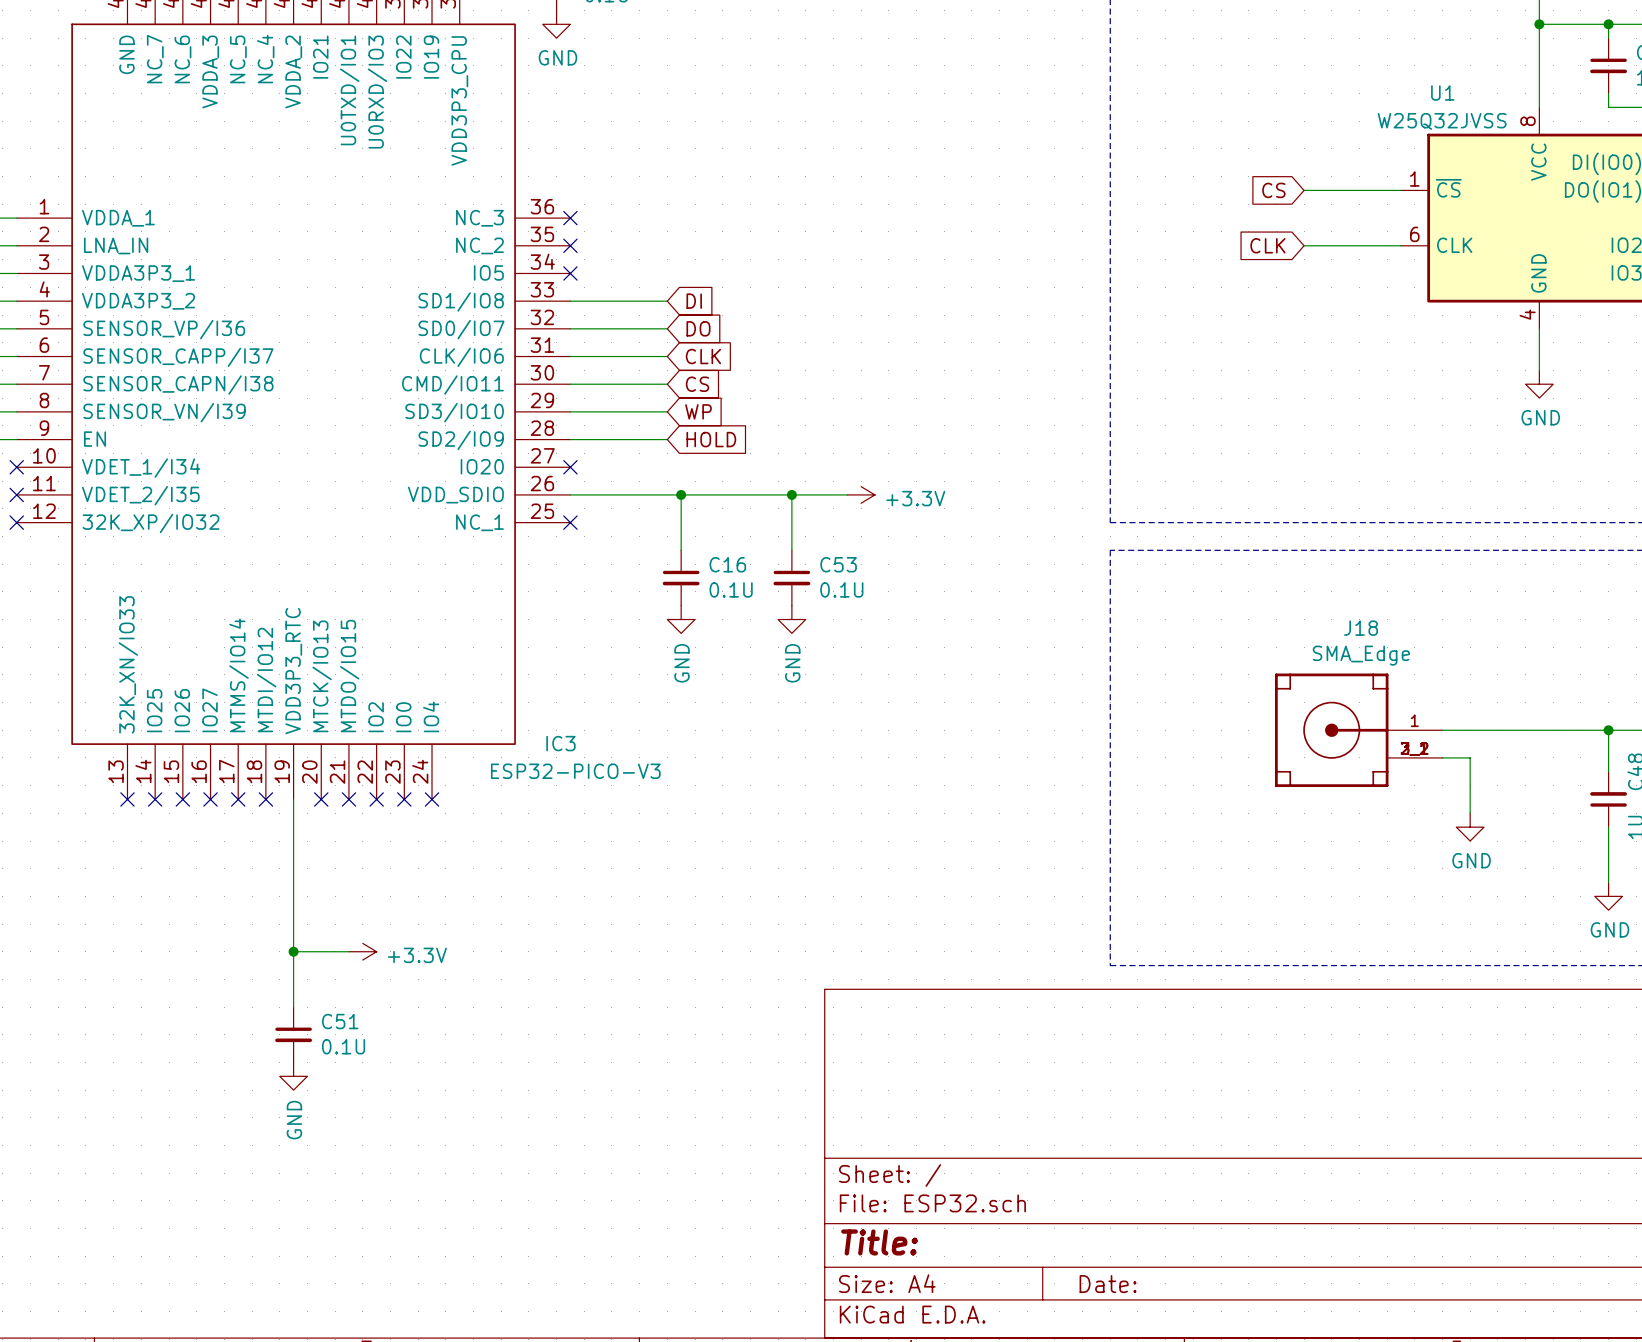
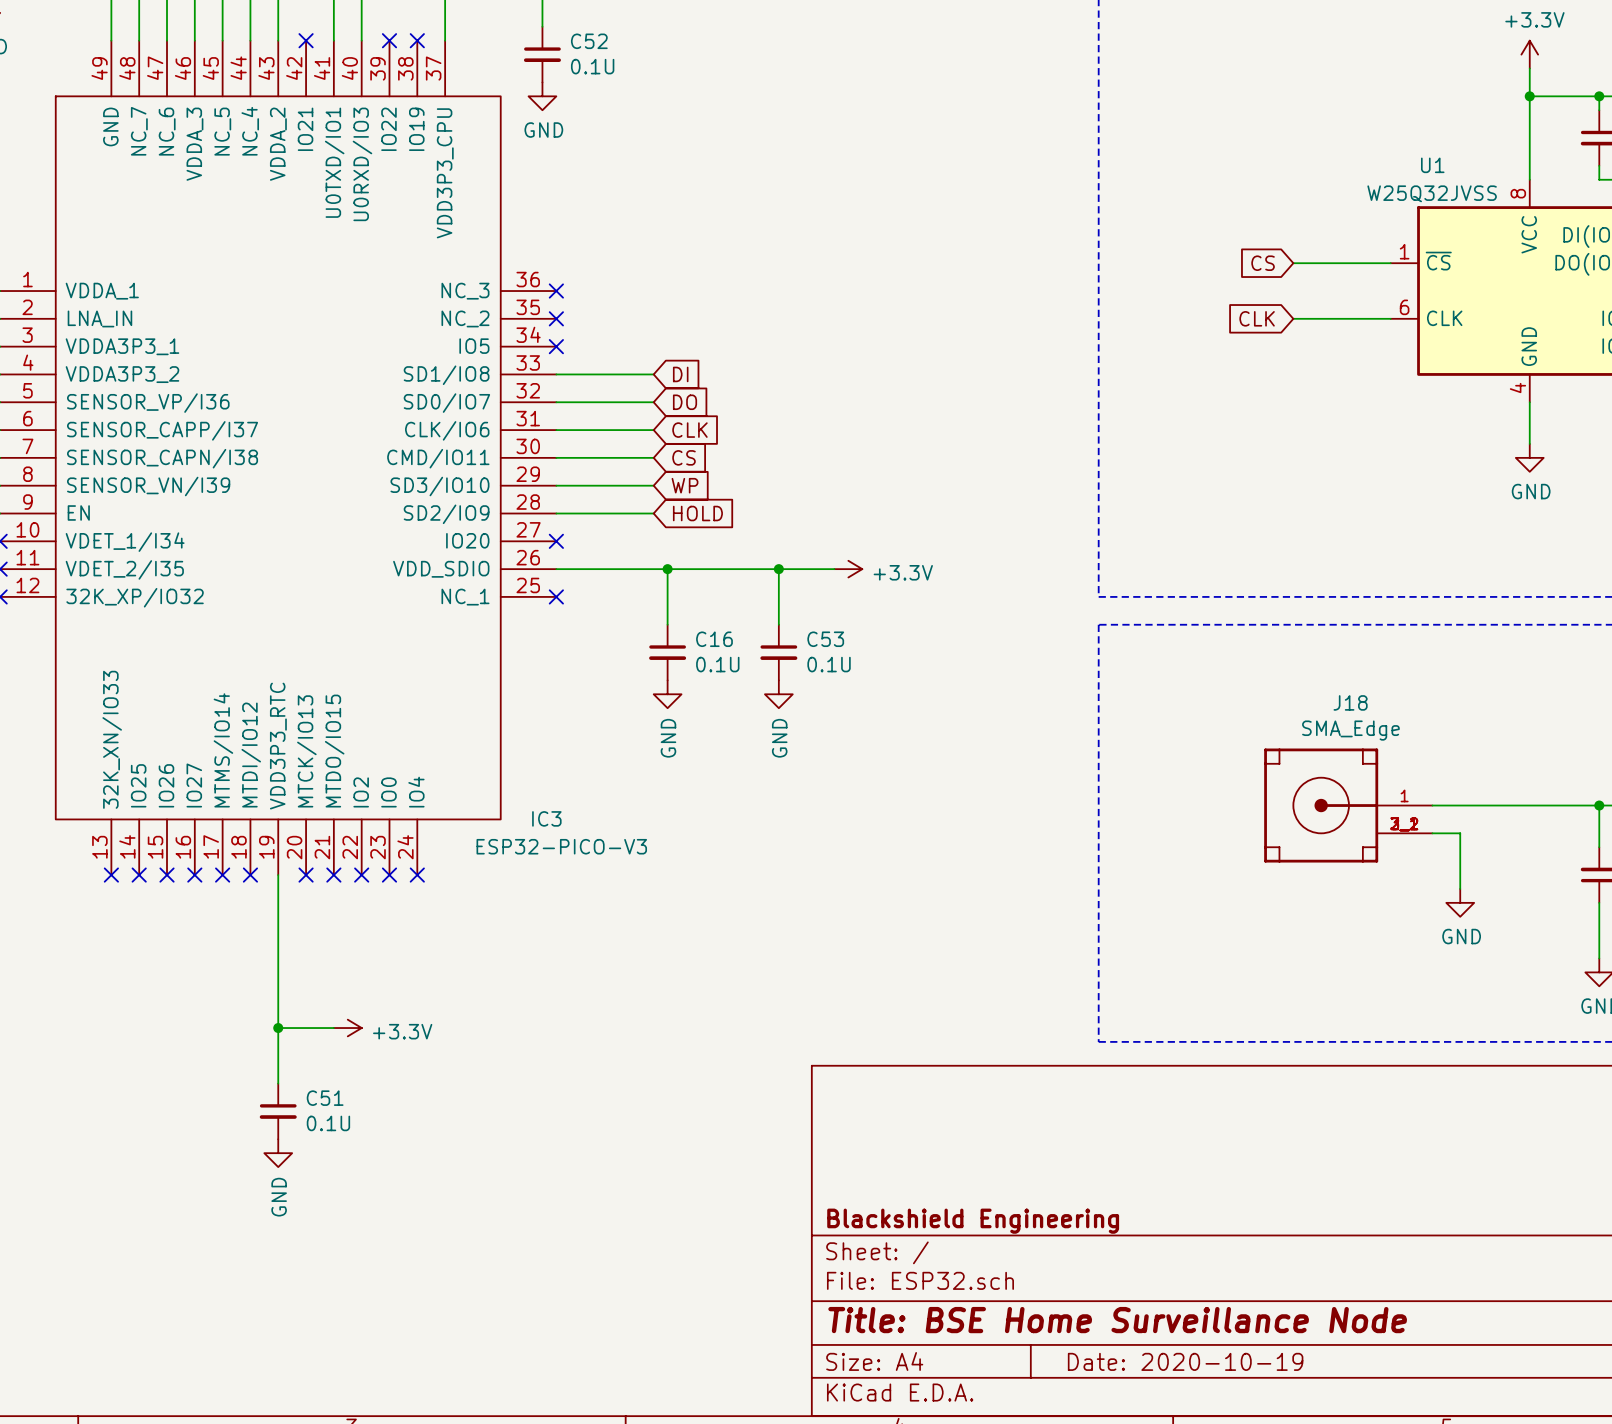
title block: none -> Blackshield Engineering (973, 1221)
title block: Title: (879, 1242) -> Title: BSE Home Surveillance Node (1117, 1320)
title block: Date: (1108, 1284) -> Date: 2020-10-19 (1185, 1361)

